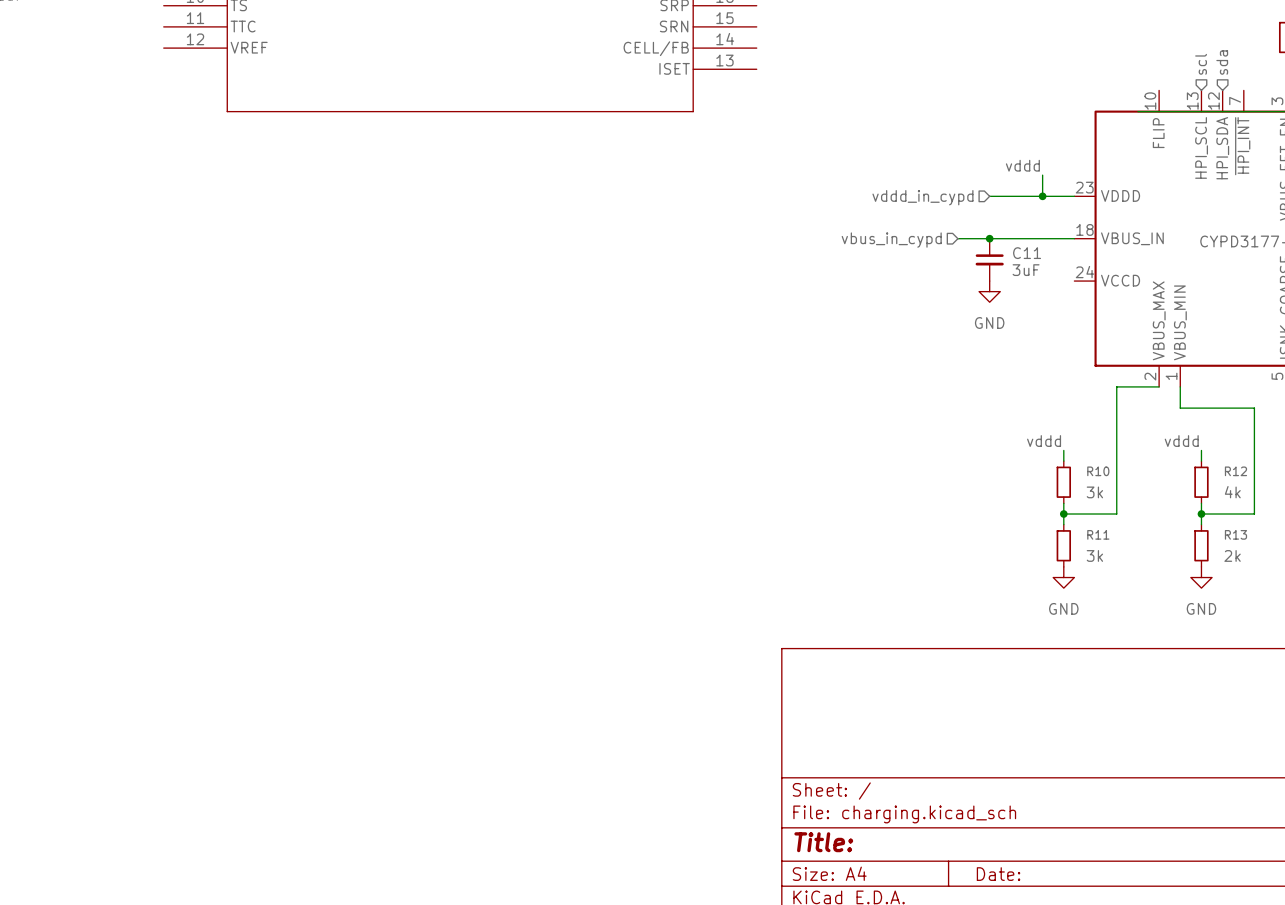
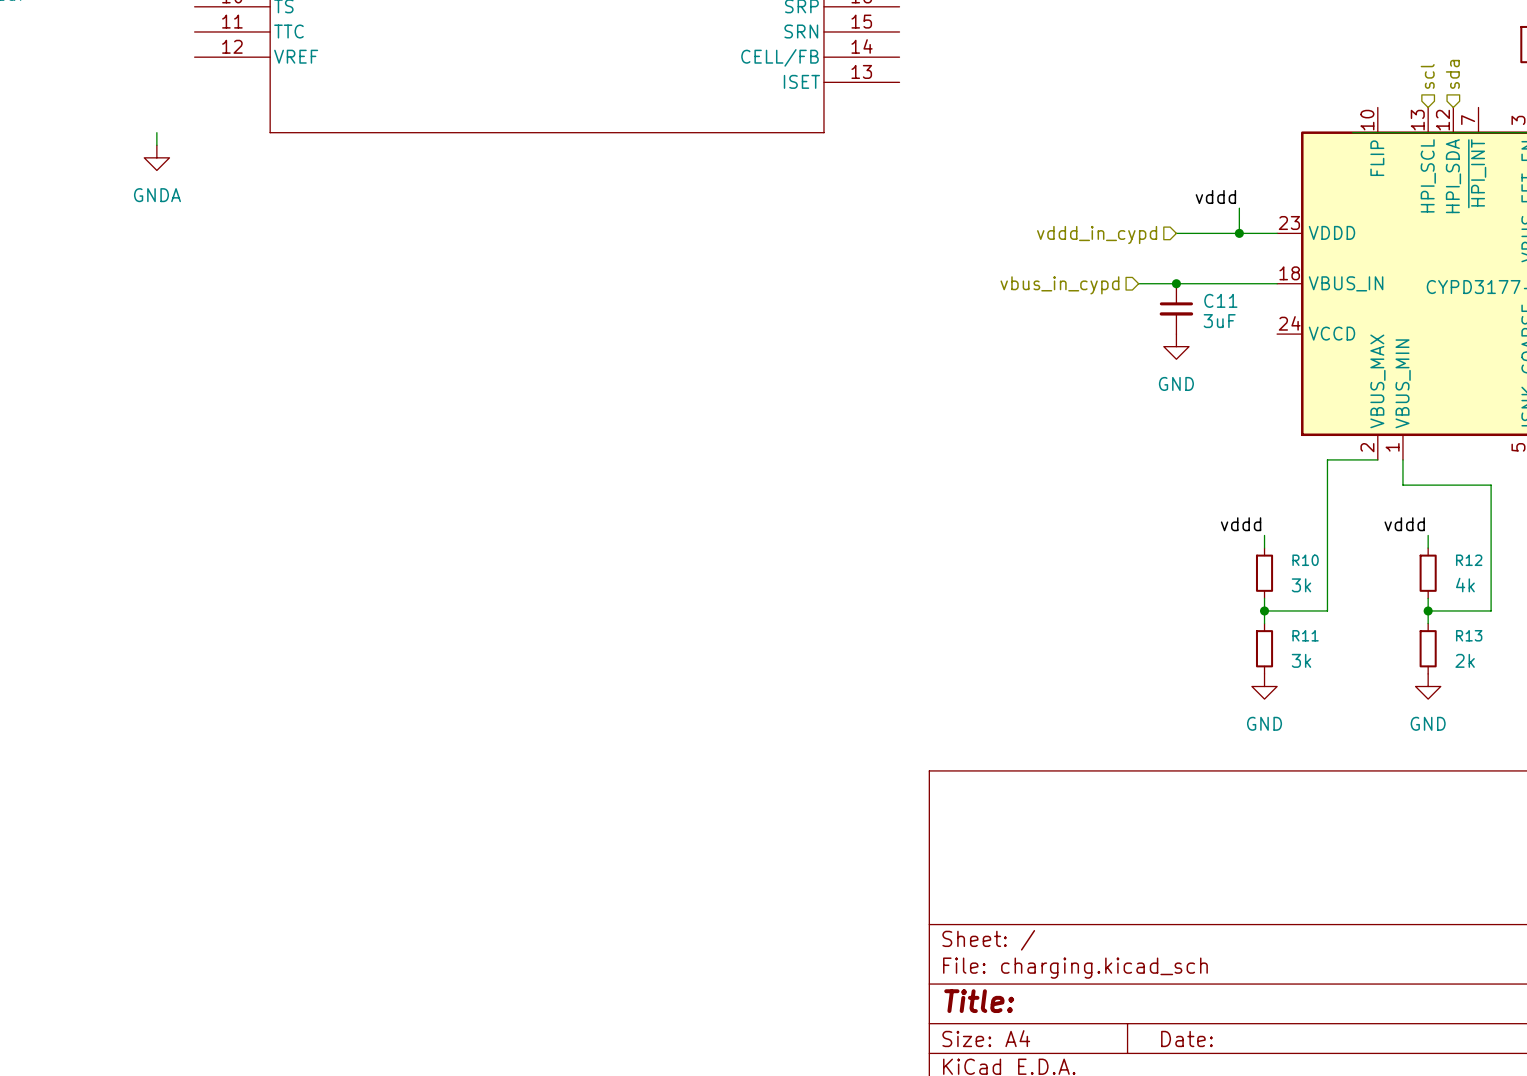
wire: none -> (156, 132) (156, 145)
power symbol: none -> GNDA (156, 157)

